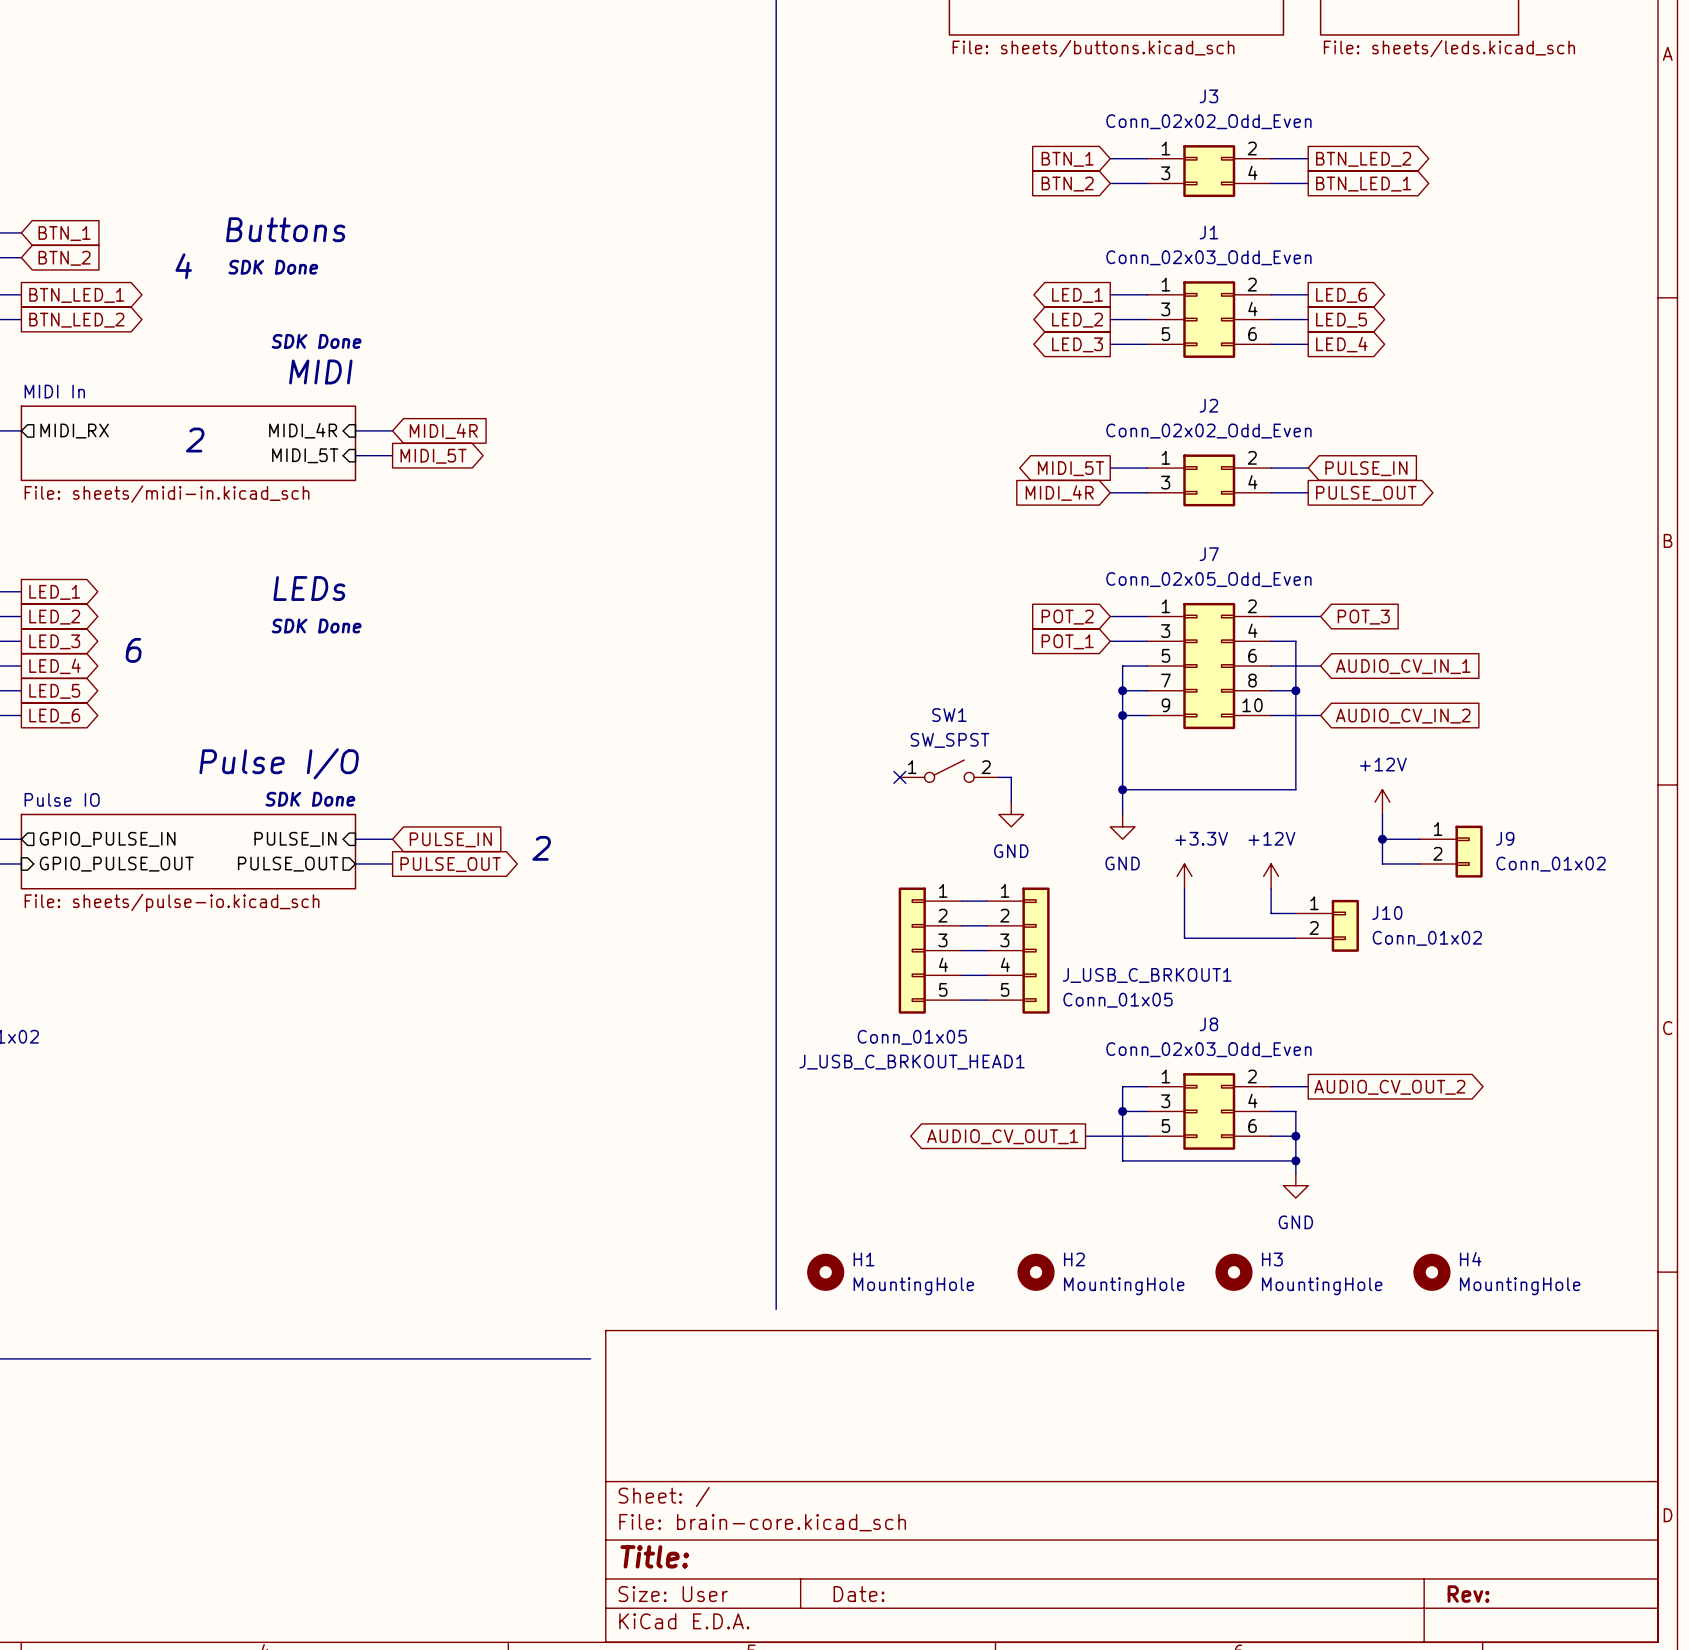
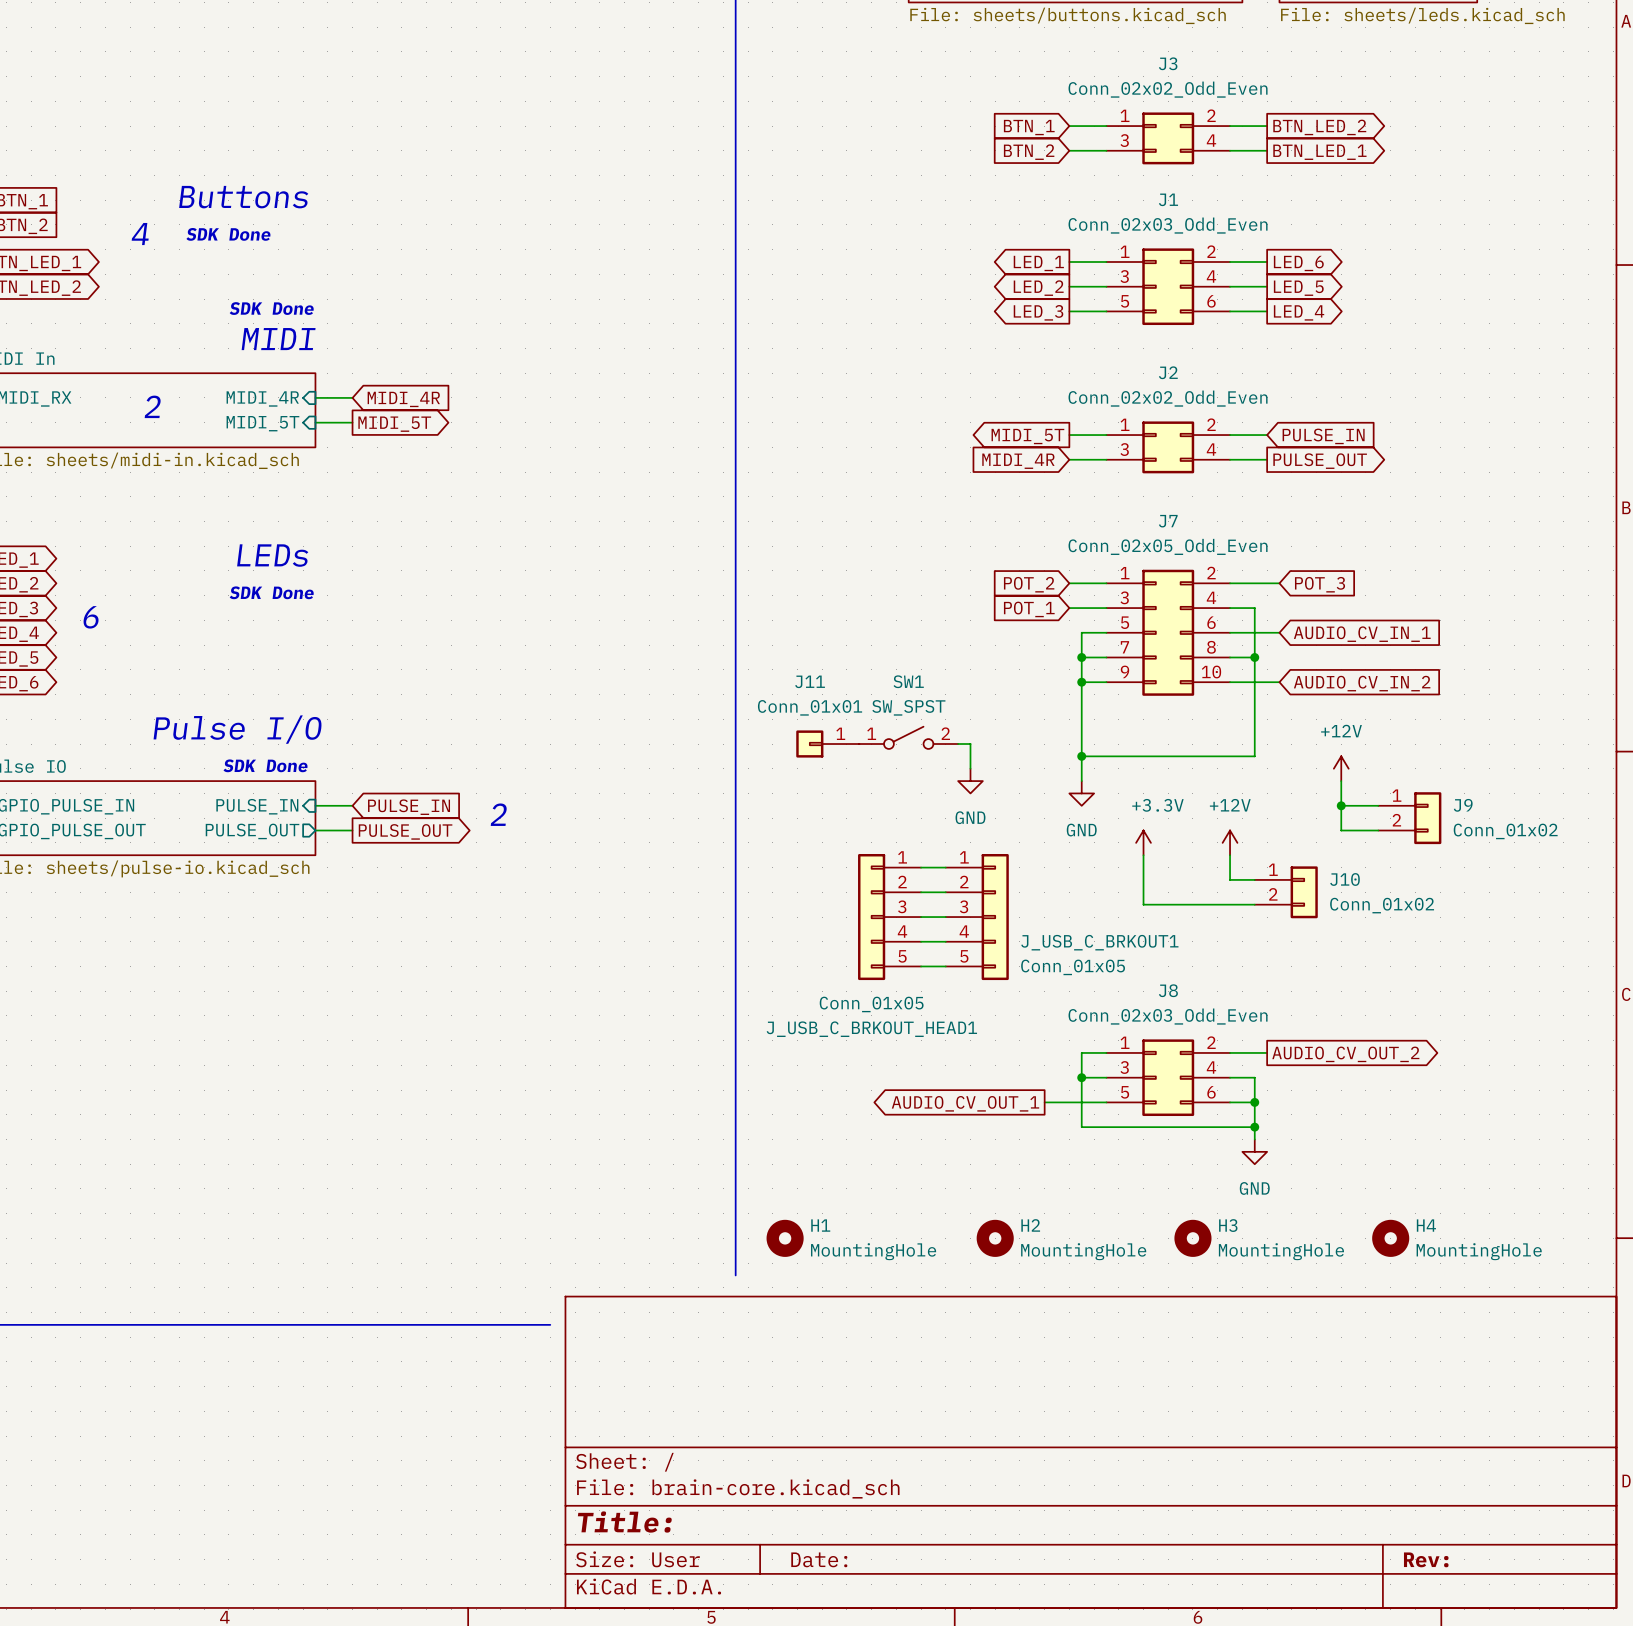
J11: none -> Conn_01x01 (827, 744)
no-connect mark: (899, 777) -> none

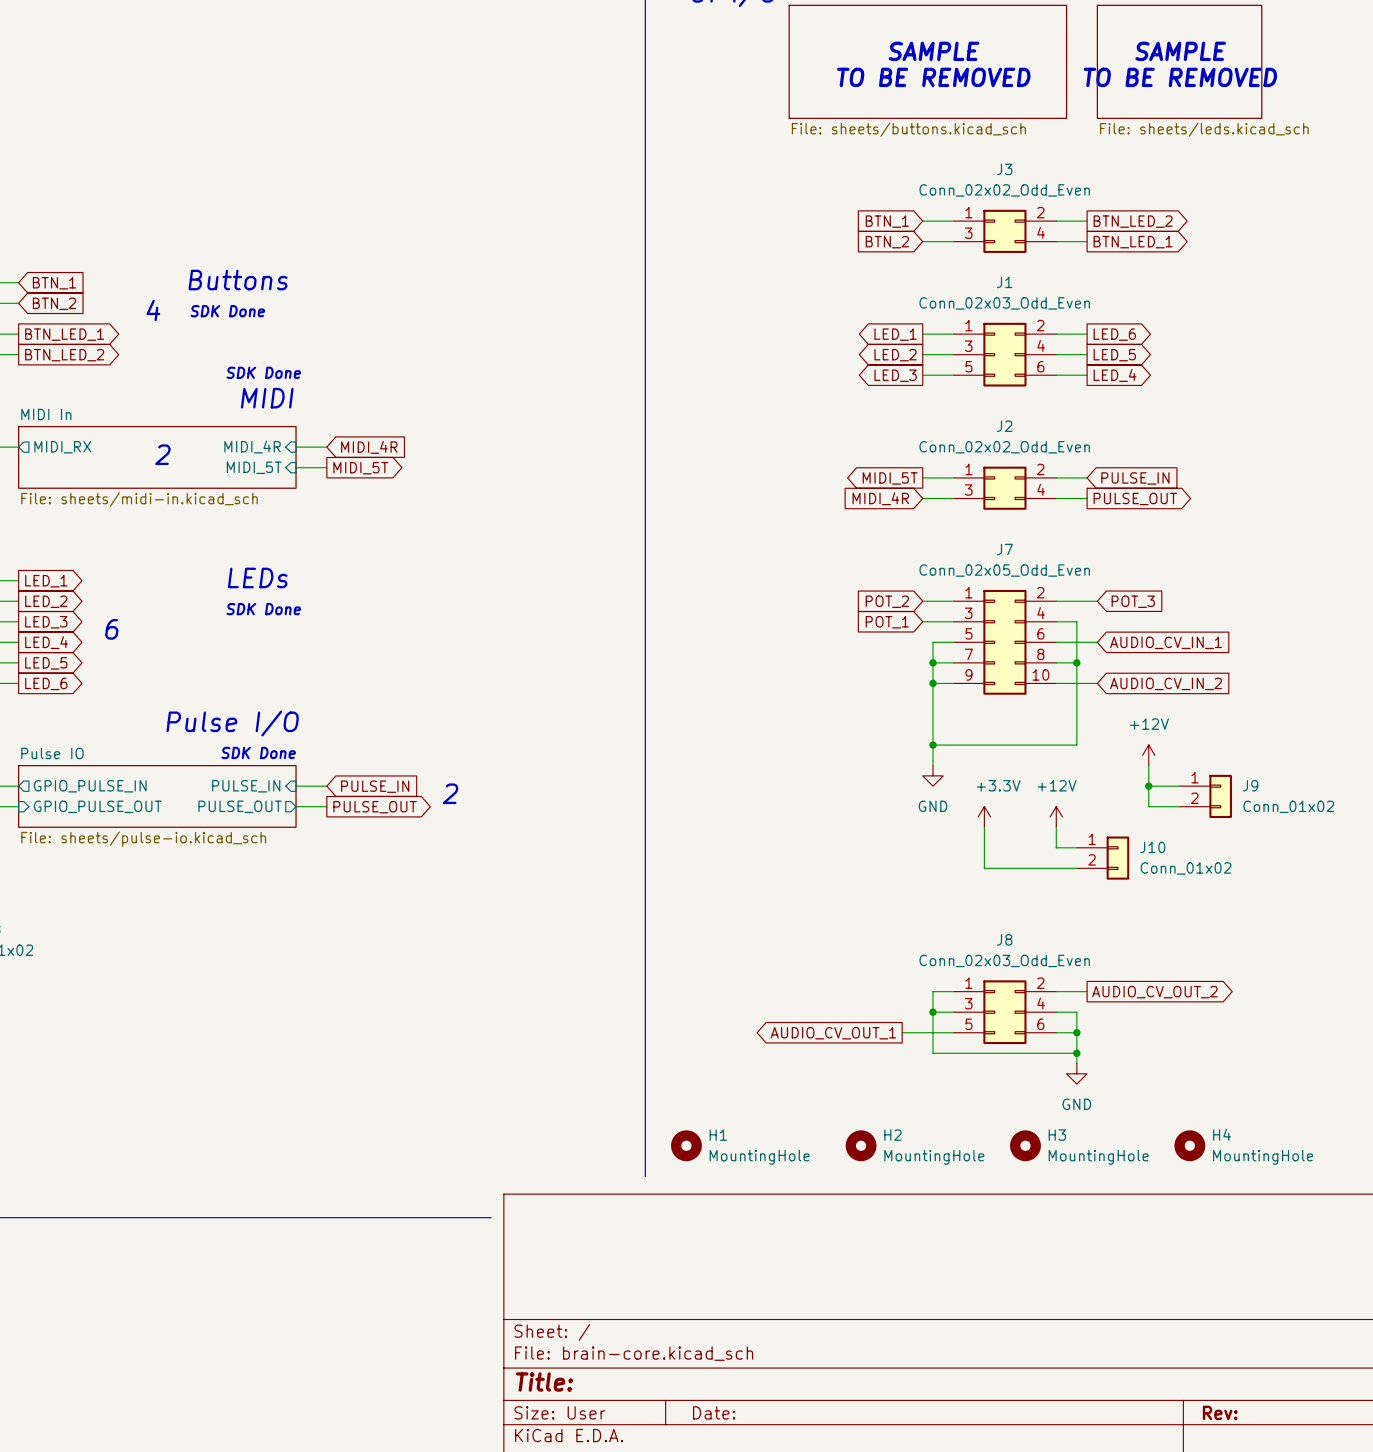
SW1: SW_SPST (908, 737) -> none
J11: Conn_01x01 (827, 744) -> none
wire: (958, 744) (970, 744) (970, 768) -> none
power symbol: GND (970, 781) -> none
wire: (921, 867) (945, 867) -> none
wire: (921, 892) (945, 892) -> none
J_USB_C_BRKOUT_HEAD1: Conn_01x05 (889, 917) -> none
wire: (921, 917) (945, 917) -> none
J_USB_C_BRKOUT1: Conn_01x05 (977, 917) -> none
wire: (921, 941) (945, 941) -> none
wire: (921, 966) (945, 966) -> none

